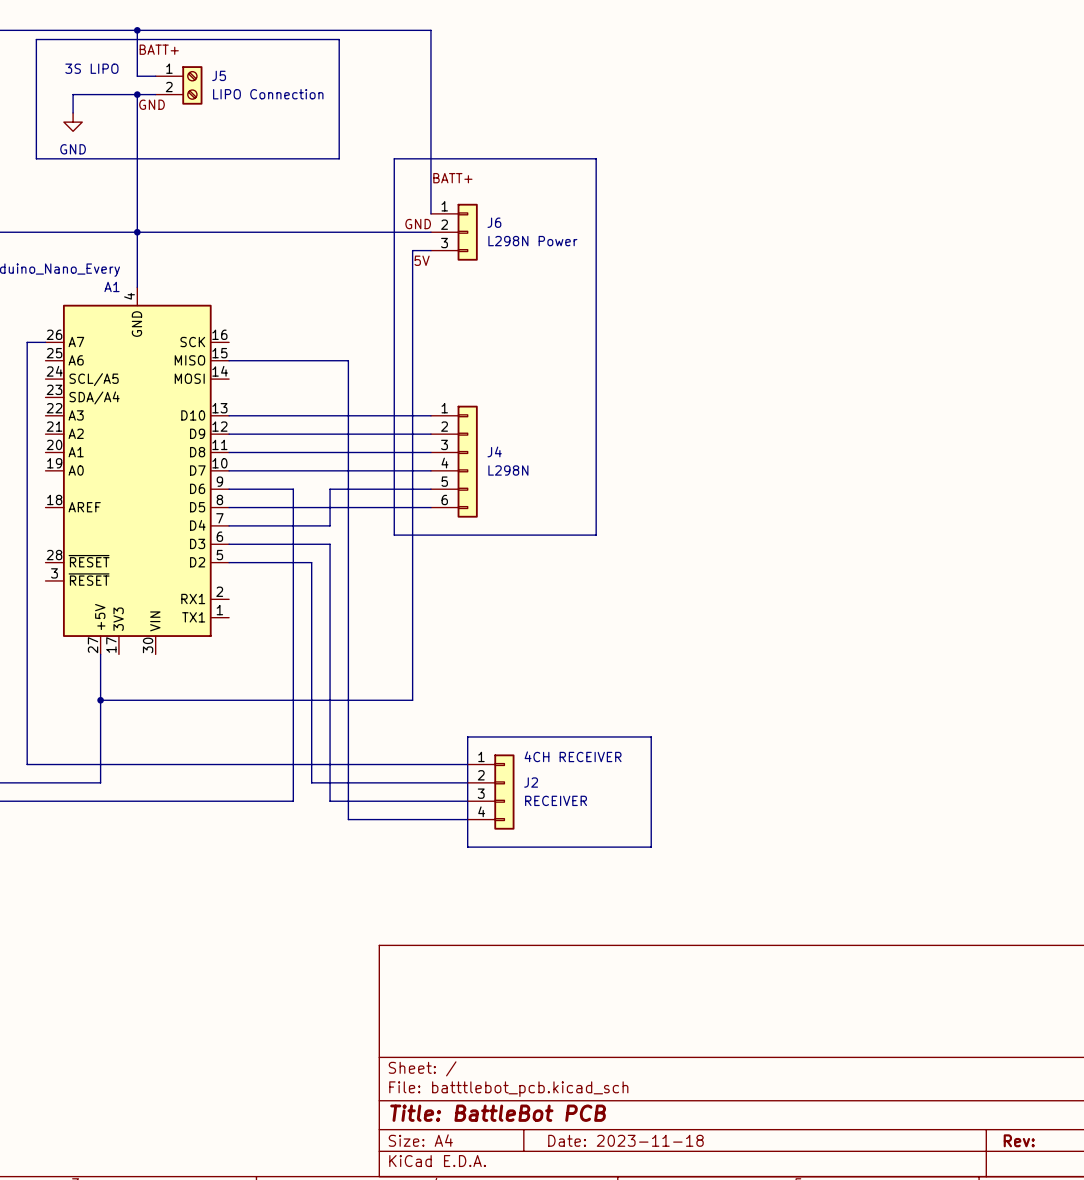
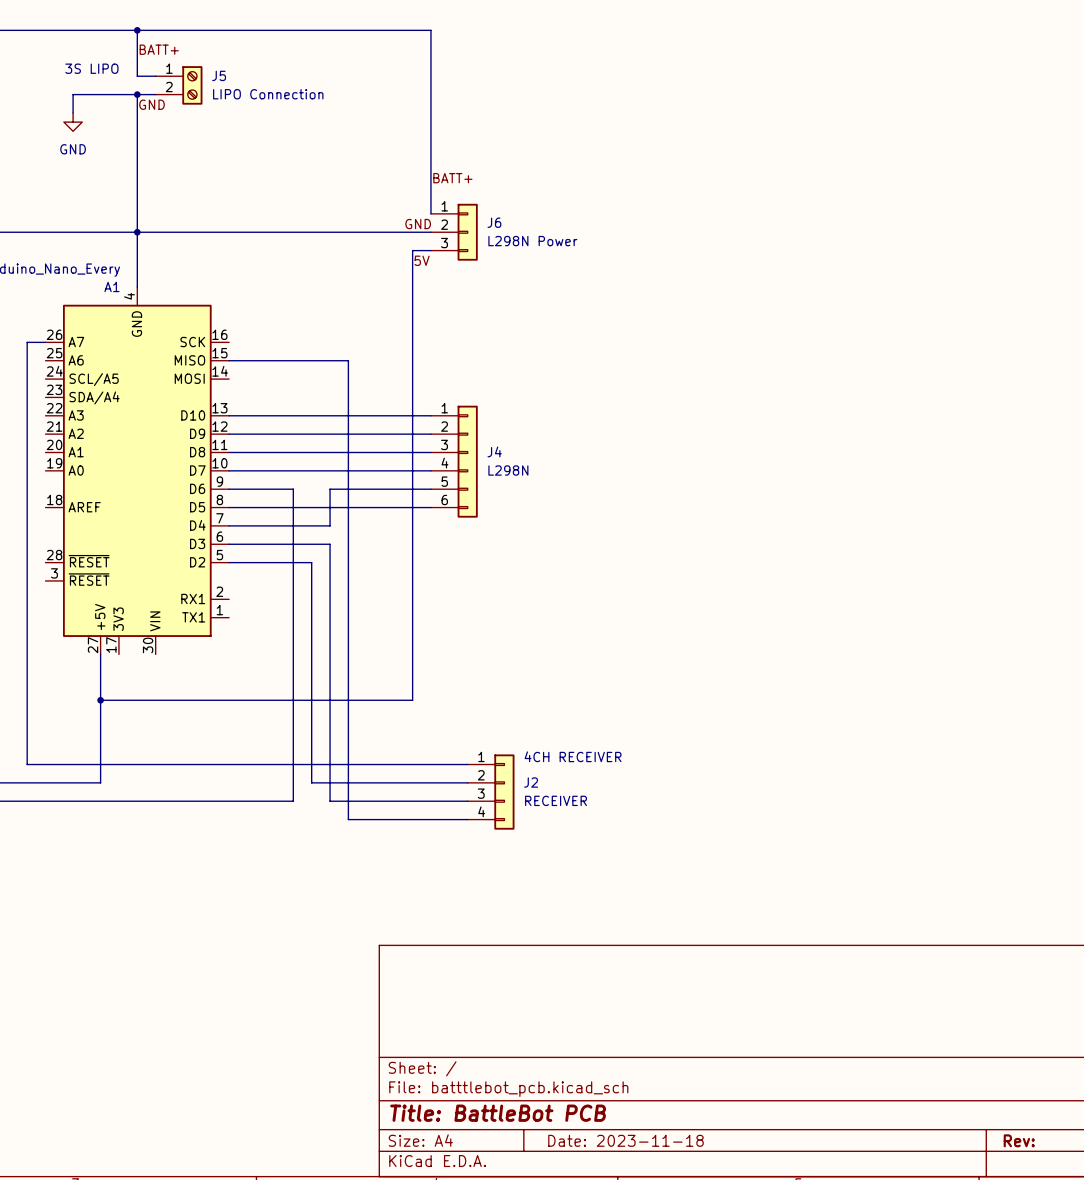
line: (36, 39) (339, 39) (339, 158) (36, 158) (36, 39) -> none
line: (394, 158) (596, 158) (596, 535) (394, 535) (394, 158) -> none
line: (467, 736) (651, 736) (651, 847) (467, 847) (467, 736) -> none

